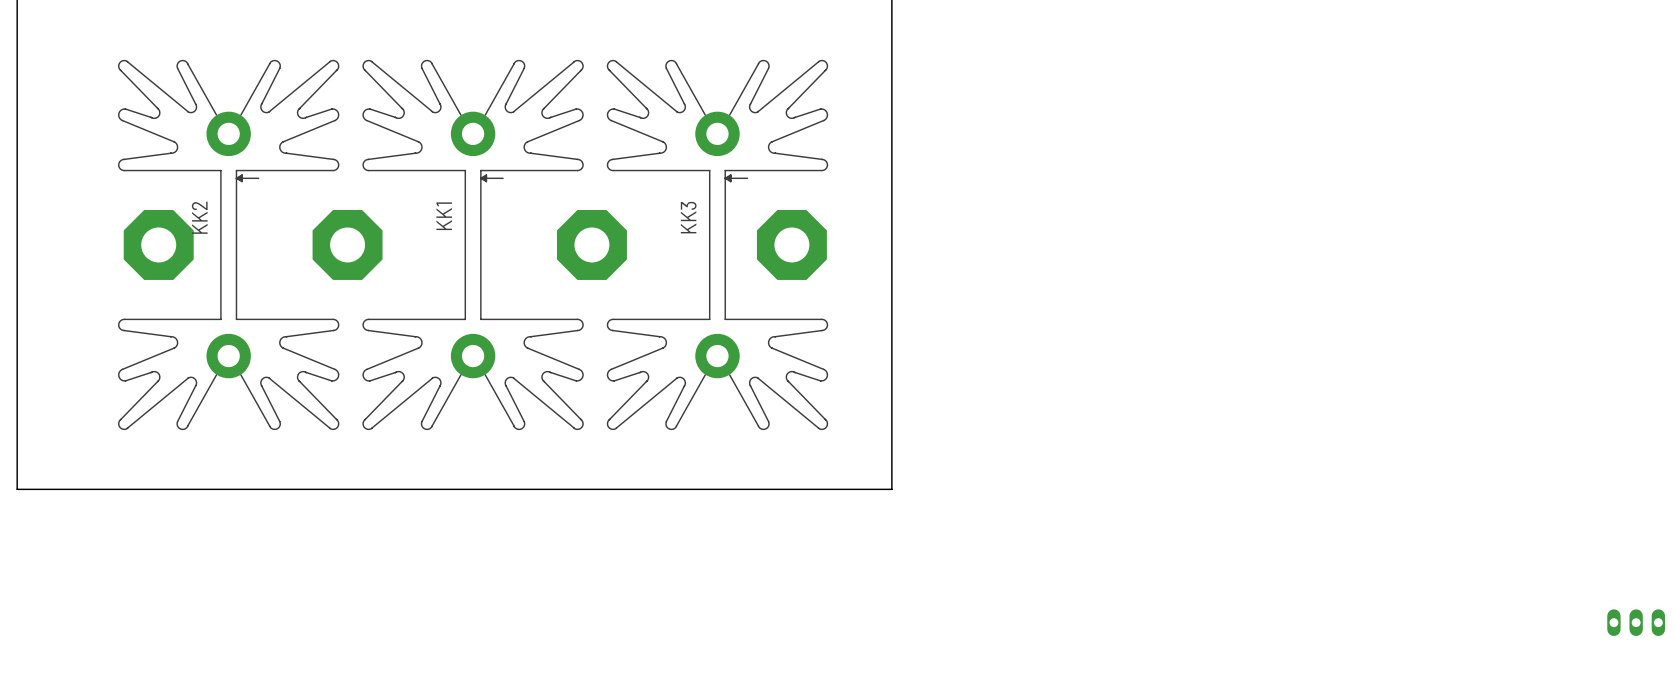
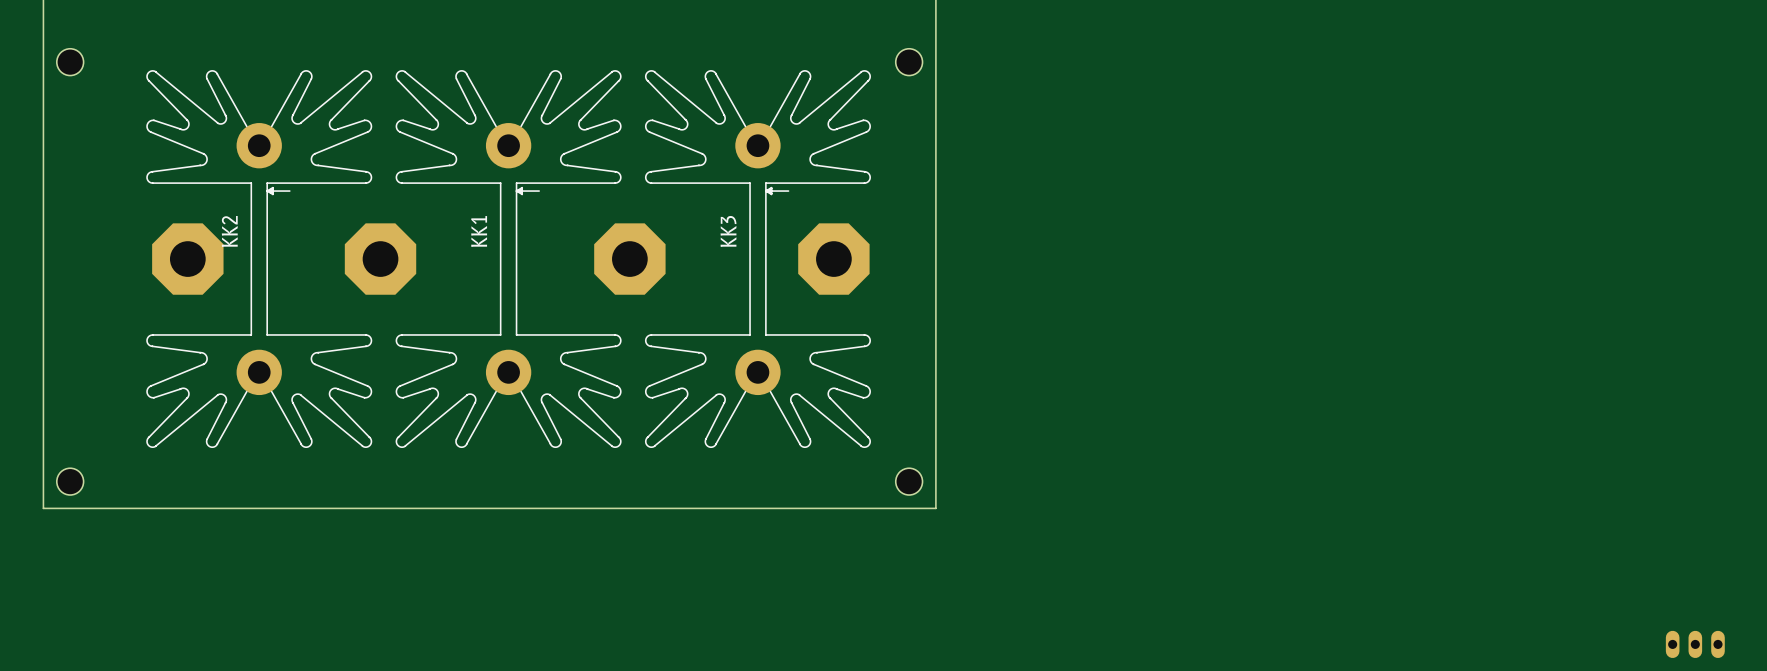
hole: none -> (70, 62)
hole: none -> (909, 62)
hole: none -> (70, 481)
hole: none -> (909, 481)

